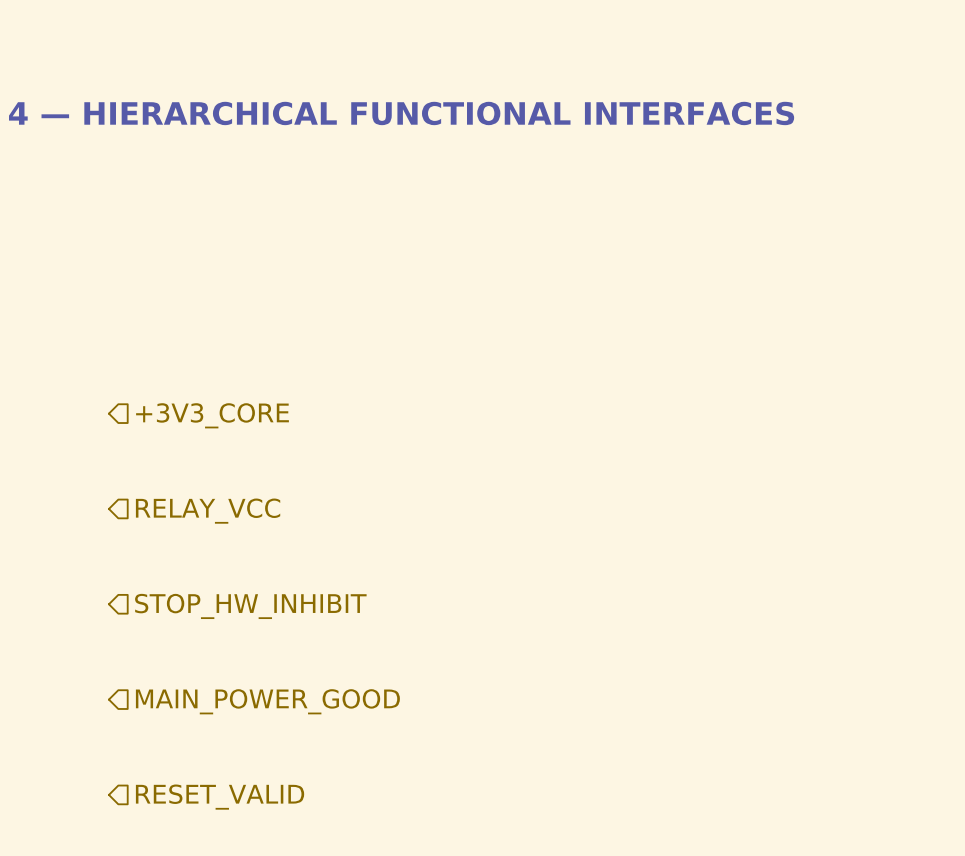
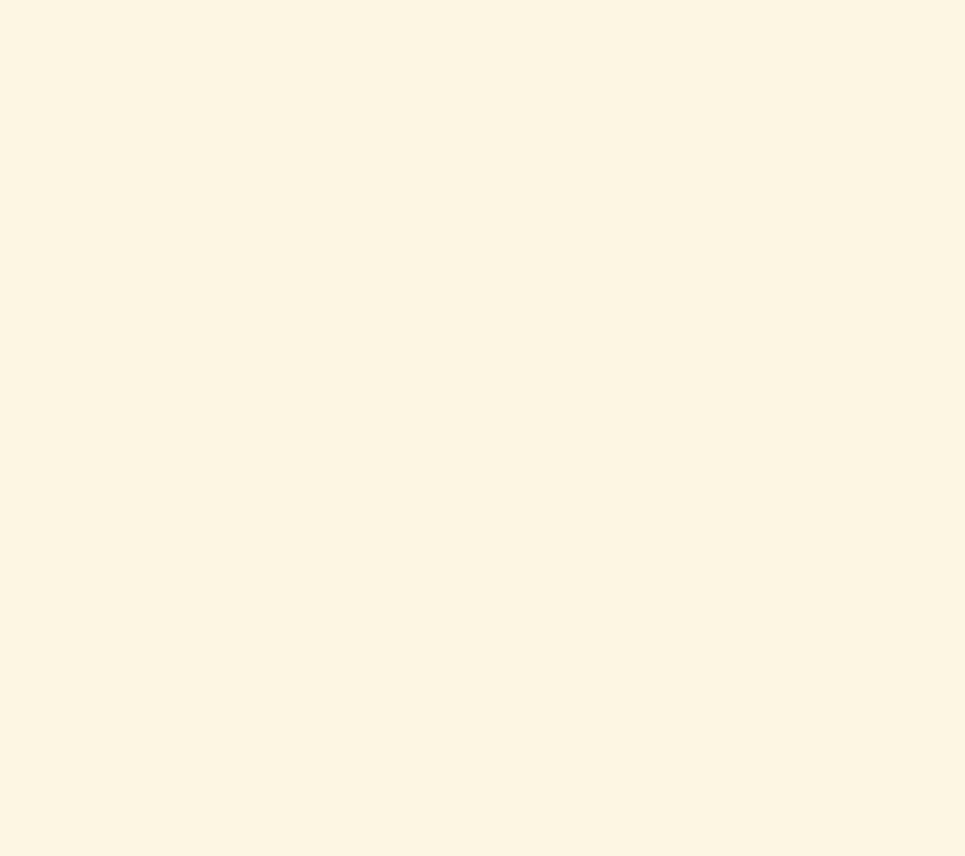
text: 4 — HIERARCHICAL FUNCTIONAL INTERFACES (401, 113) -> none
hierarchical label: +3V3_CORE (212, 415) -> none
hierarchical label: RELAY_VCC (208, 511) -> none
hierarchical label: STOP_HW_INHIBIT (250, 606) -> none
hierarchical label: MAIN_POWER_GOOD (267, 701) -> none
hierarchical label: RESET_VALID (220, 797) -> none

